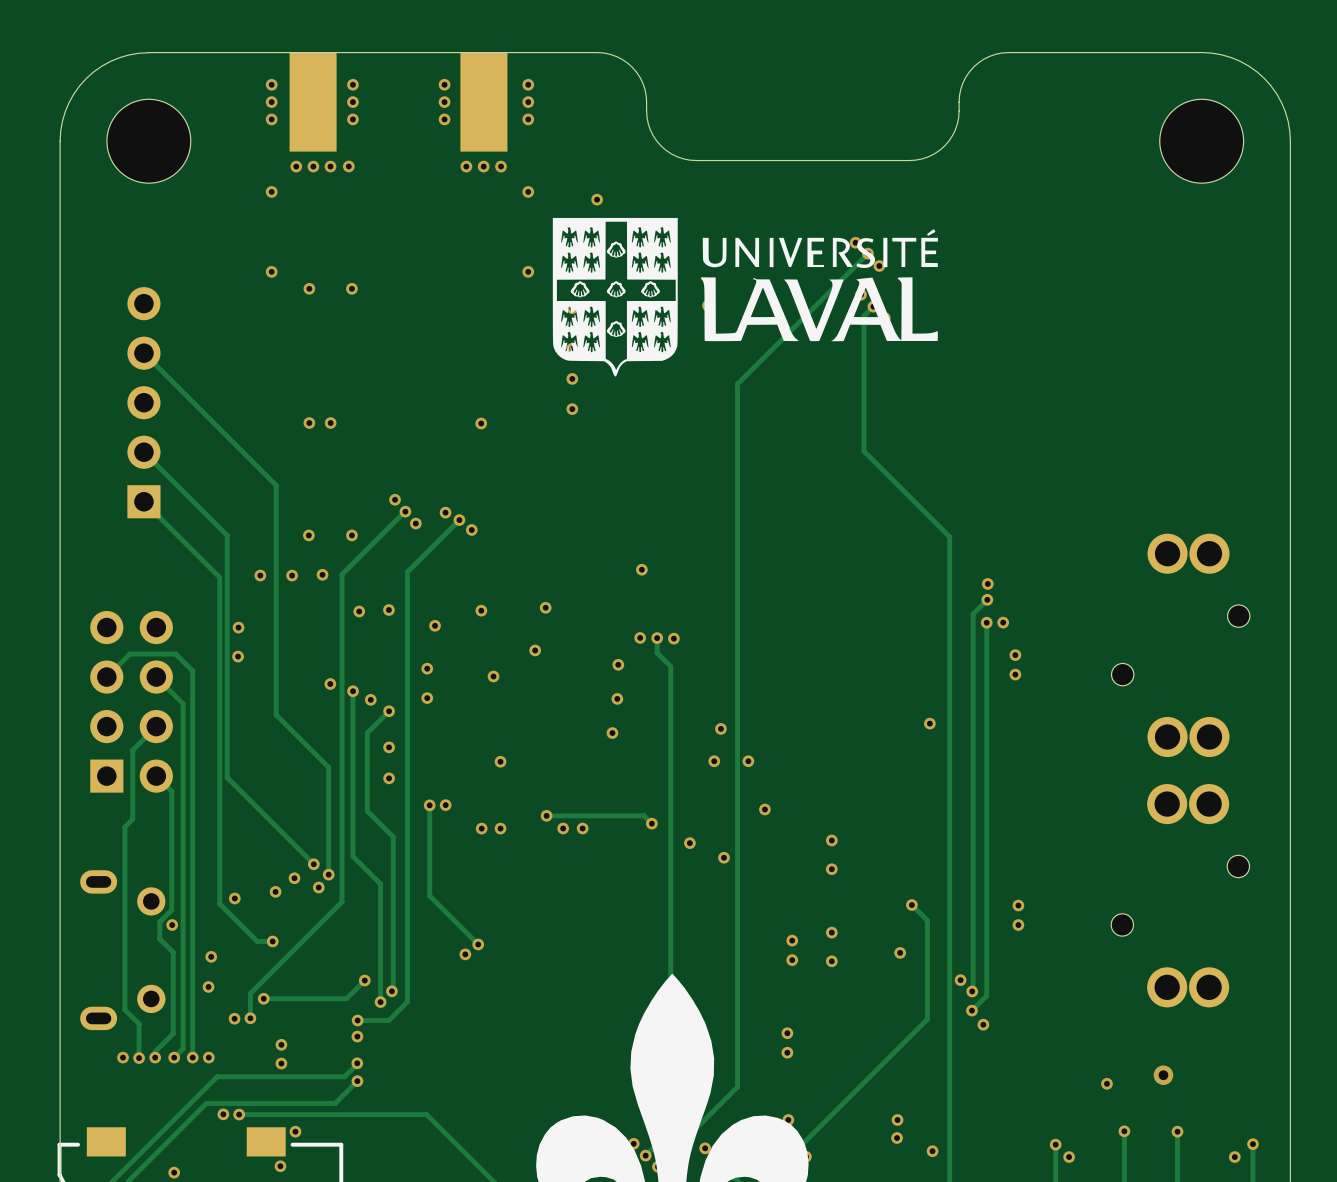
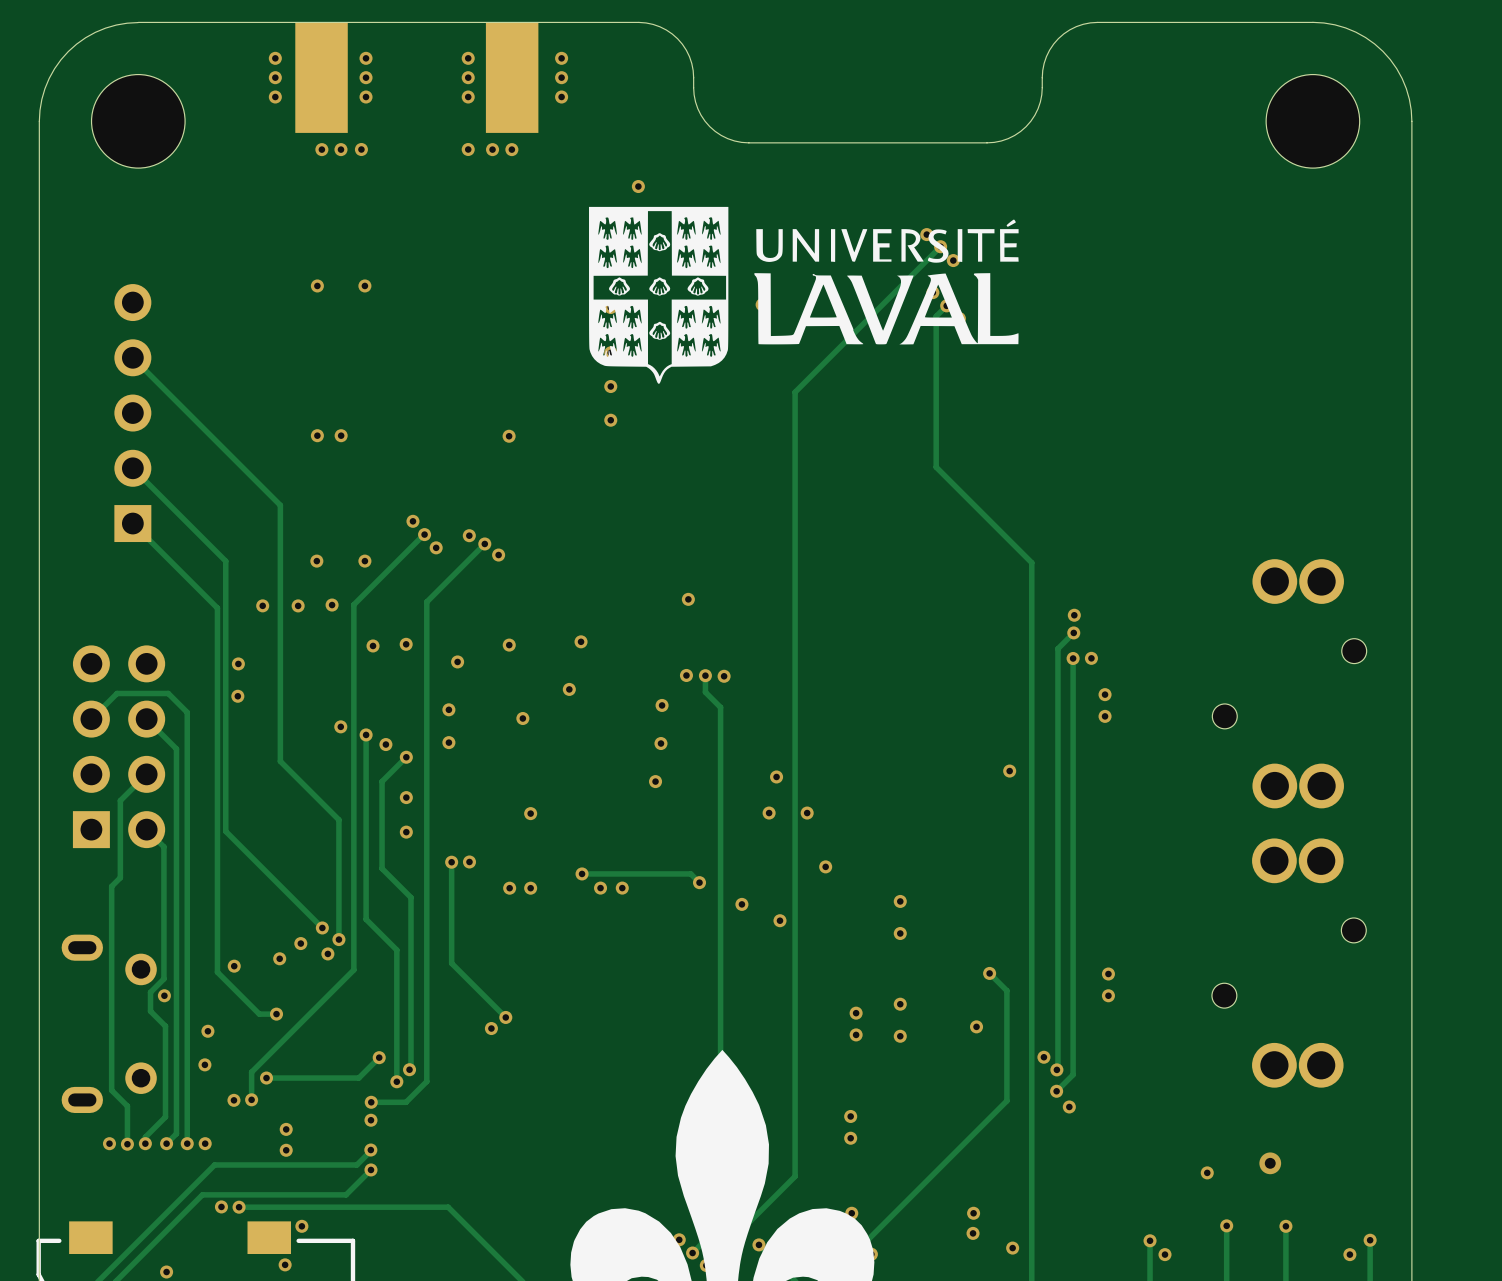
via: (296, 166) -> none
via: none -> (468, 149)
via: (501, 166) -> none
via: (271, 191) -> none
via: (528, 191) -> none
via: (271, 271) -> none
via: (528, 271) -> none

